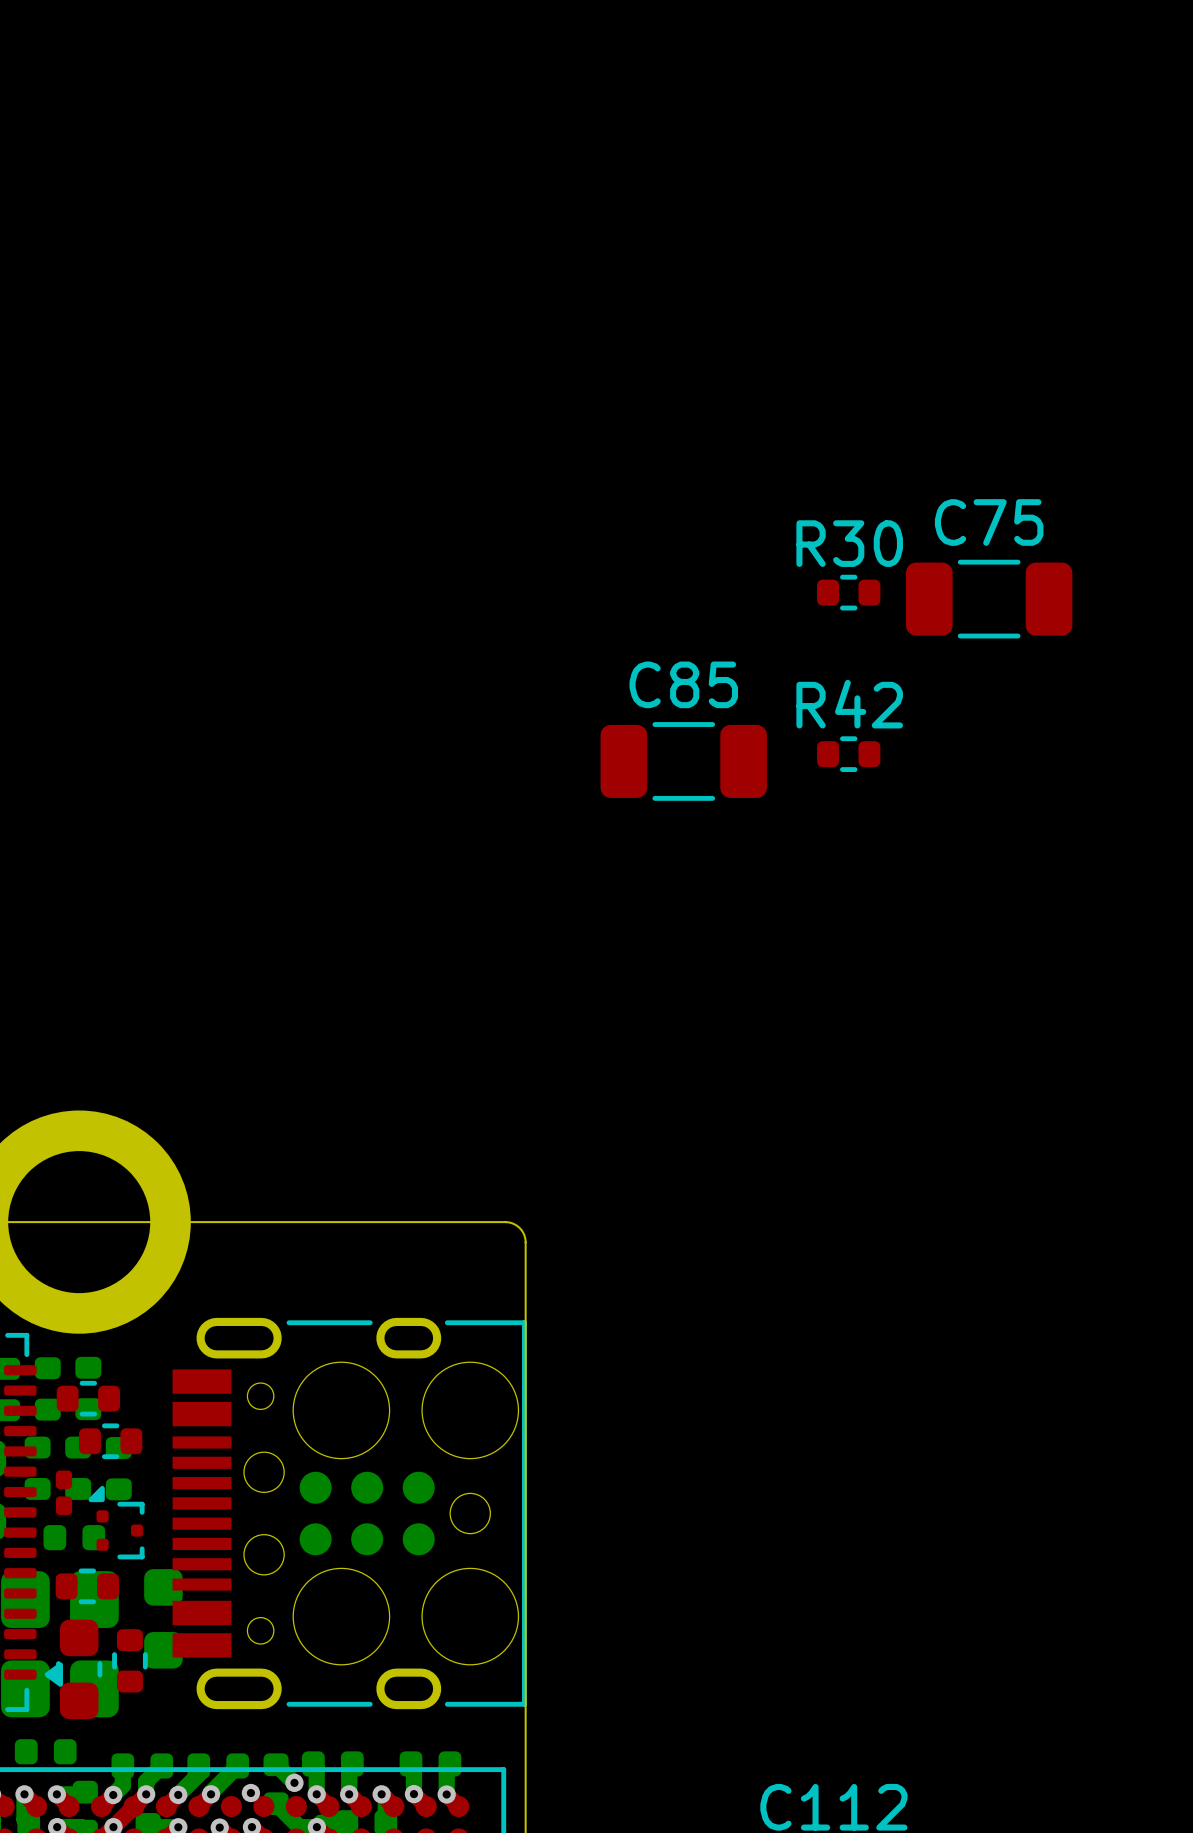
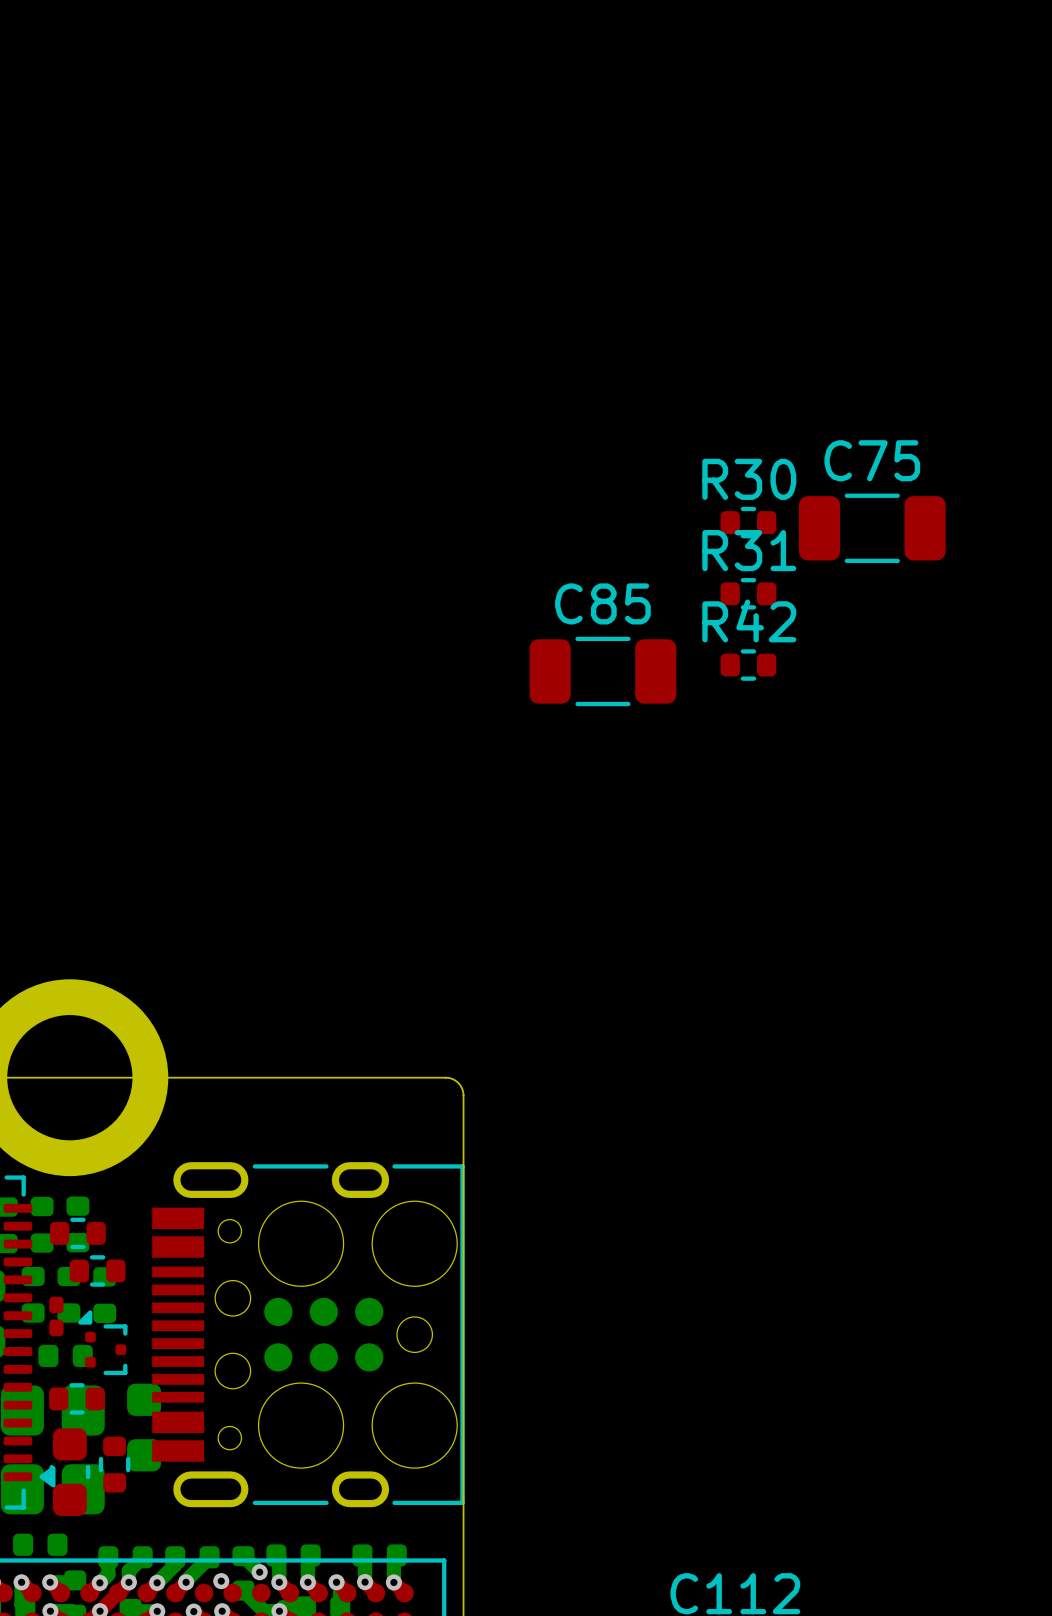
R31: none -> (748, 593)

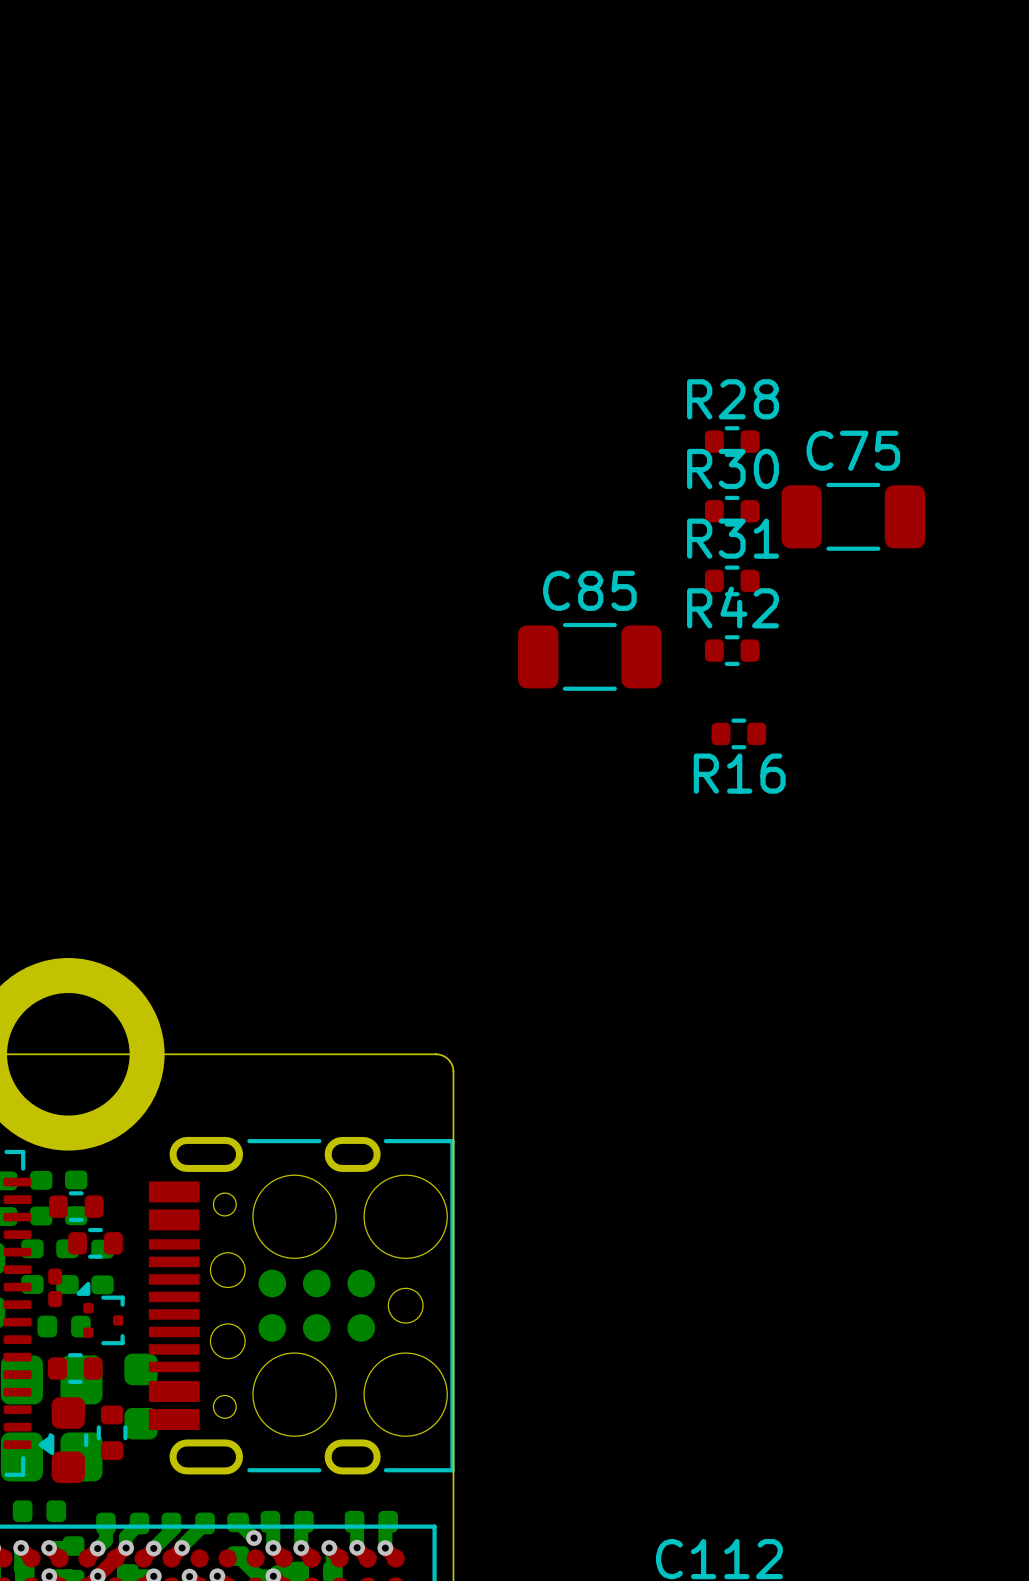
R28: none -> (732, 441)
R16: none -> (738, 733)
via: (221, 1581) -> none

